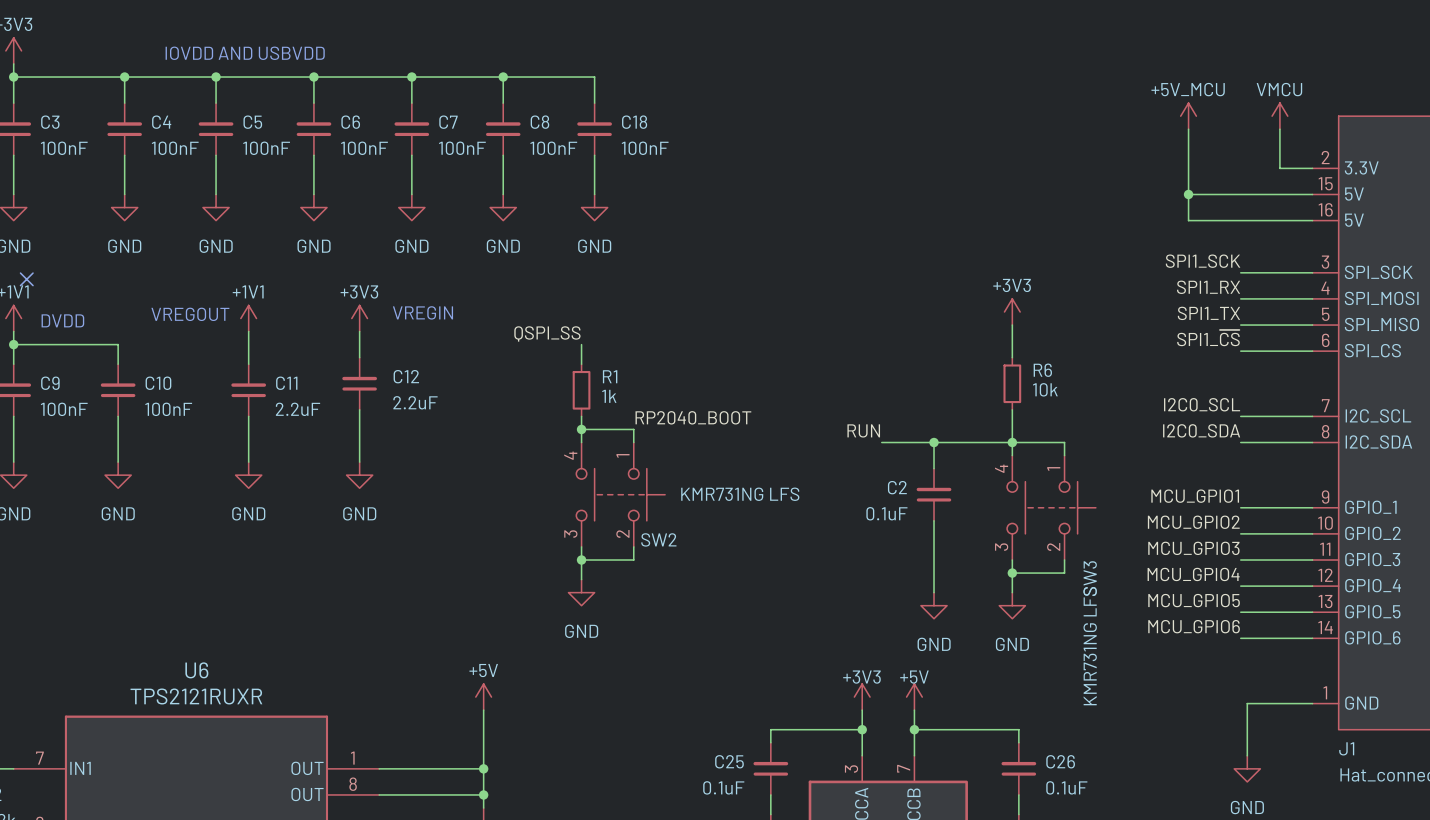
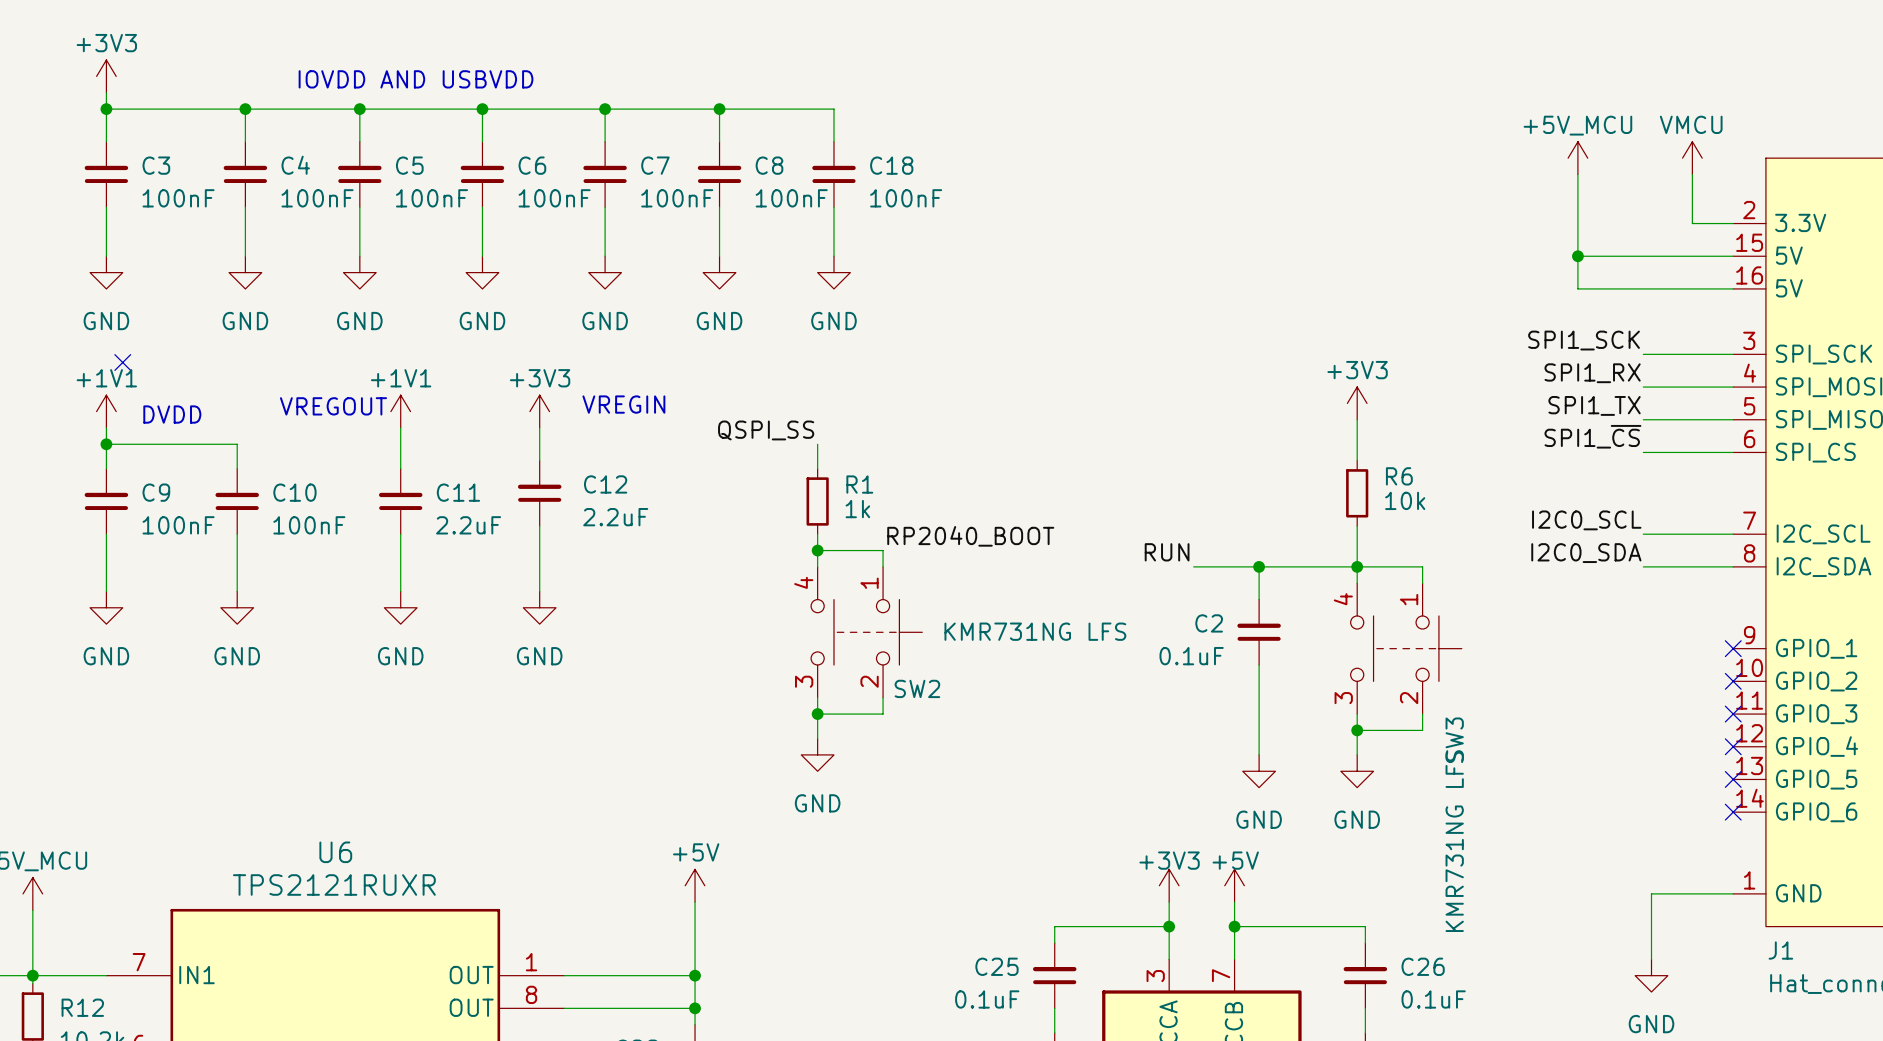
label: MCU_GPIO1 (1195, 496) -> none
wire: (1240, 507) (1312, 507) -> none
no-connect mark: none -> (1733, 648)
label: MCU_GPIO2 (1193, 522) -> none
wire: (1240, 533) (1312, 533) -> none
no-connect mark: none -> (1733, 681)
label: MCU_GPIO3 (1193, 548) -> none
wire: (1240, 560) (1312, 560) -> none
no-connect mark: none -> (1733, 714)
label: MCU_GPIO4 (1193, 574) -> none
wire: (1240, 586) (1312, 586) -> none
no-connect mark: none -> (1733, 746)
label: MCU_GPIO5 (1194, 600) -> none
wire: (1240, 612) (1312, 612) -> none
no-connect mark: none -> (1733, 779)
label: MCU_GPIO6 (1194, 626) -> none
wire: (1240, 638) (1312, 638) -> none
no-connect mark: none -> (1733, 812)

